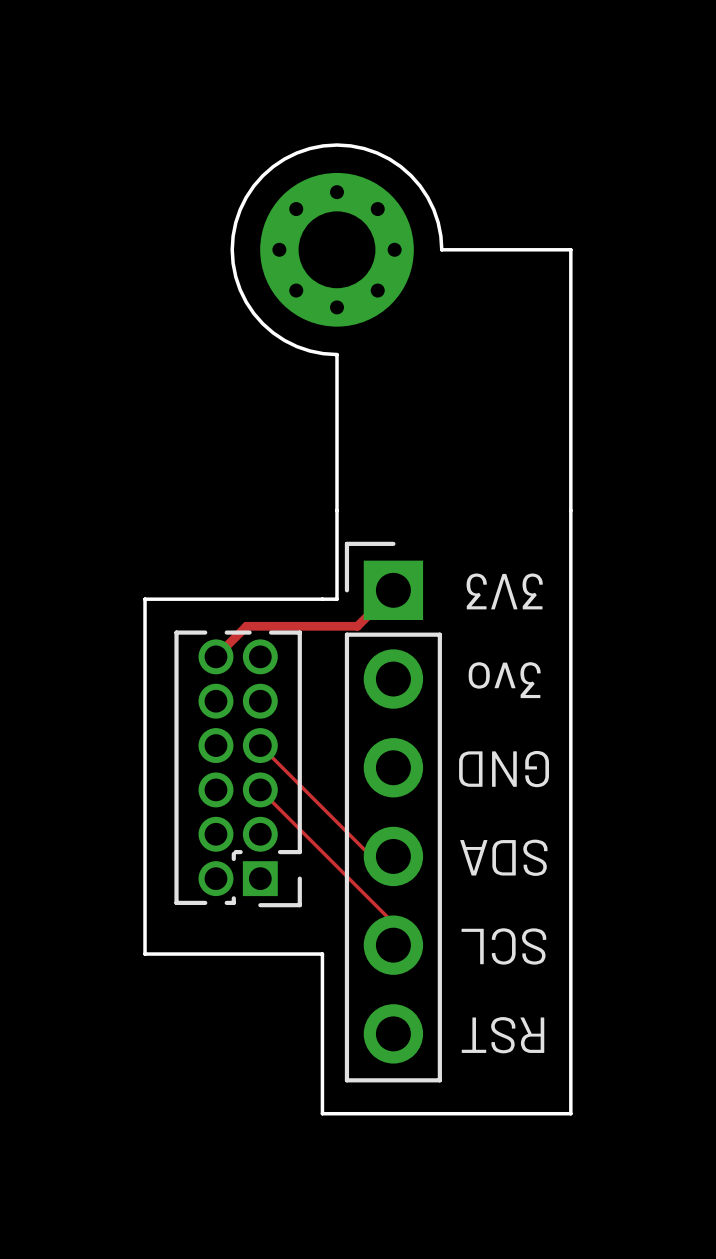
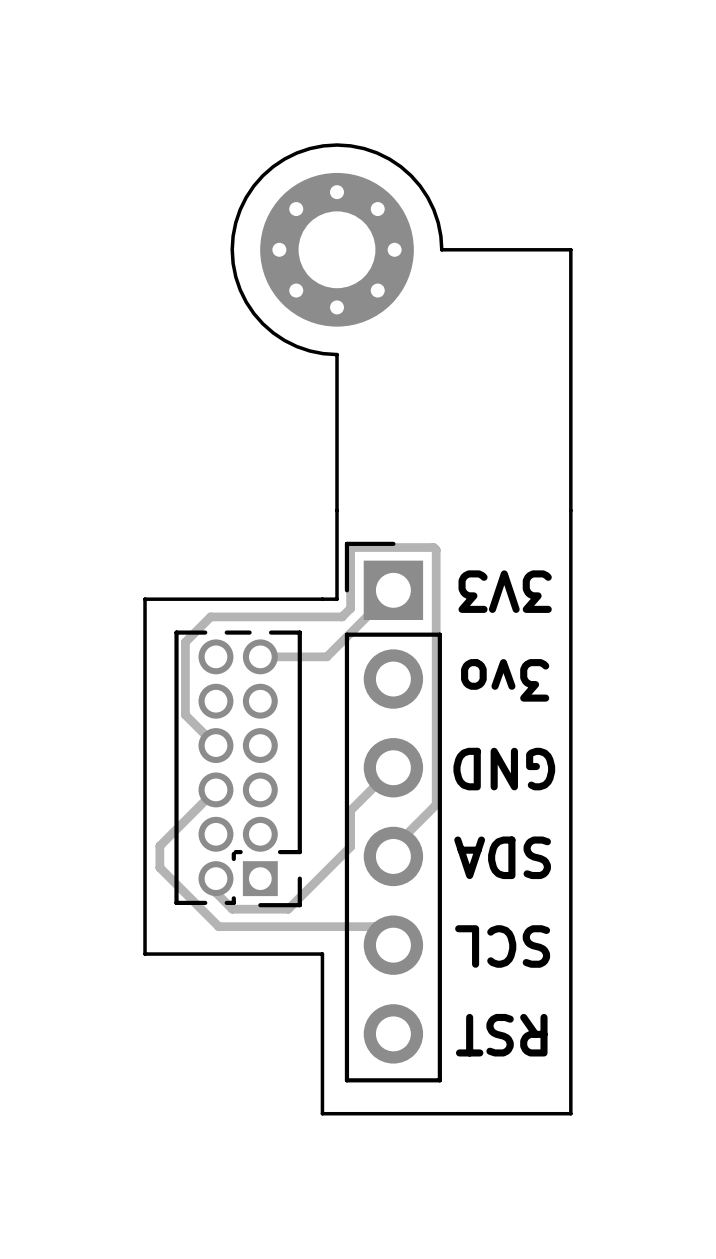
track: (357, 626) (246, 626) (215, 656) -> (357, 626) (326, 656) (260, 656)
track: (260, 745) (371, 856) (393, 856) -> (215, 745) (185, 715) (185, 642) (210, 616) (342, 616) (350, 608) (350, 550) (353, 547) (433, 547) (436, 550) (436, 804) (393, 847) (393, 856)
track: none -> (393, 767) (350, 810) (350, 846) (288, 909) (232, 909) (215, 892) (215, 878)
track: (260, 789) (393, 922) (393, 945) -> (215, 789) (159, 846) (159, 867) (218, 926) (374, 926) (393, 945)

